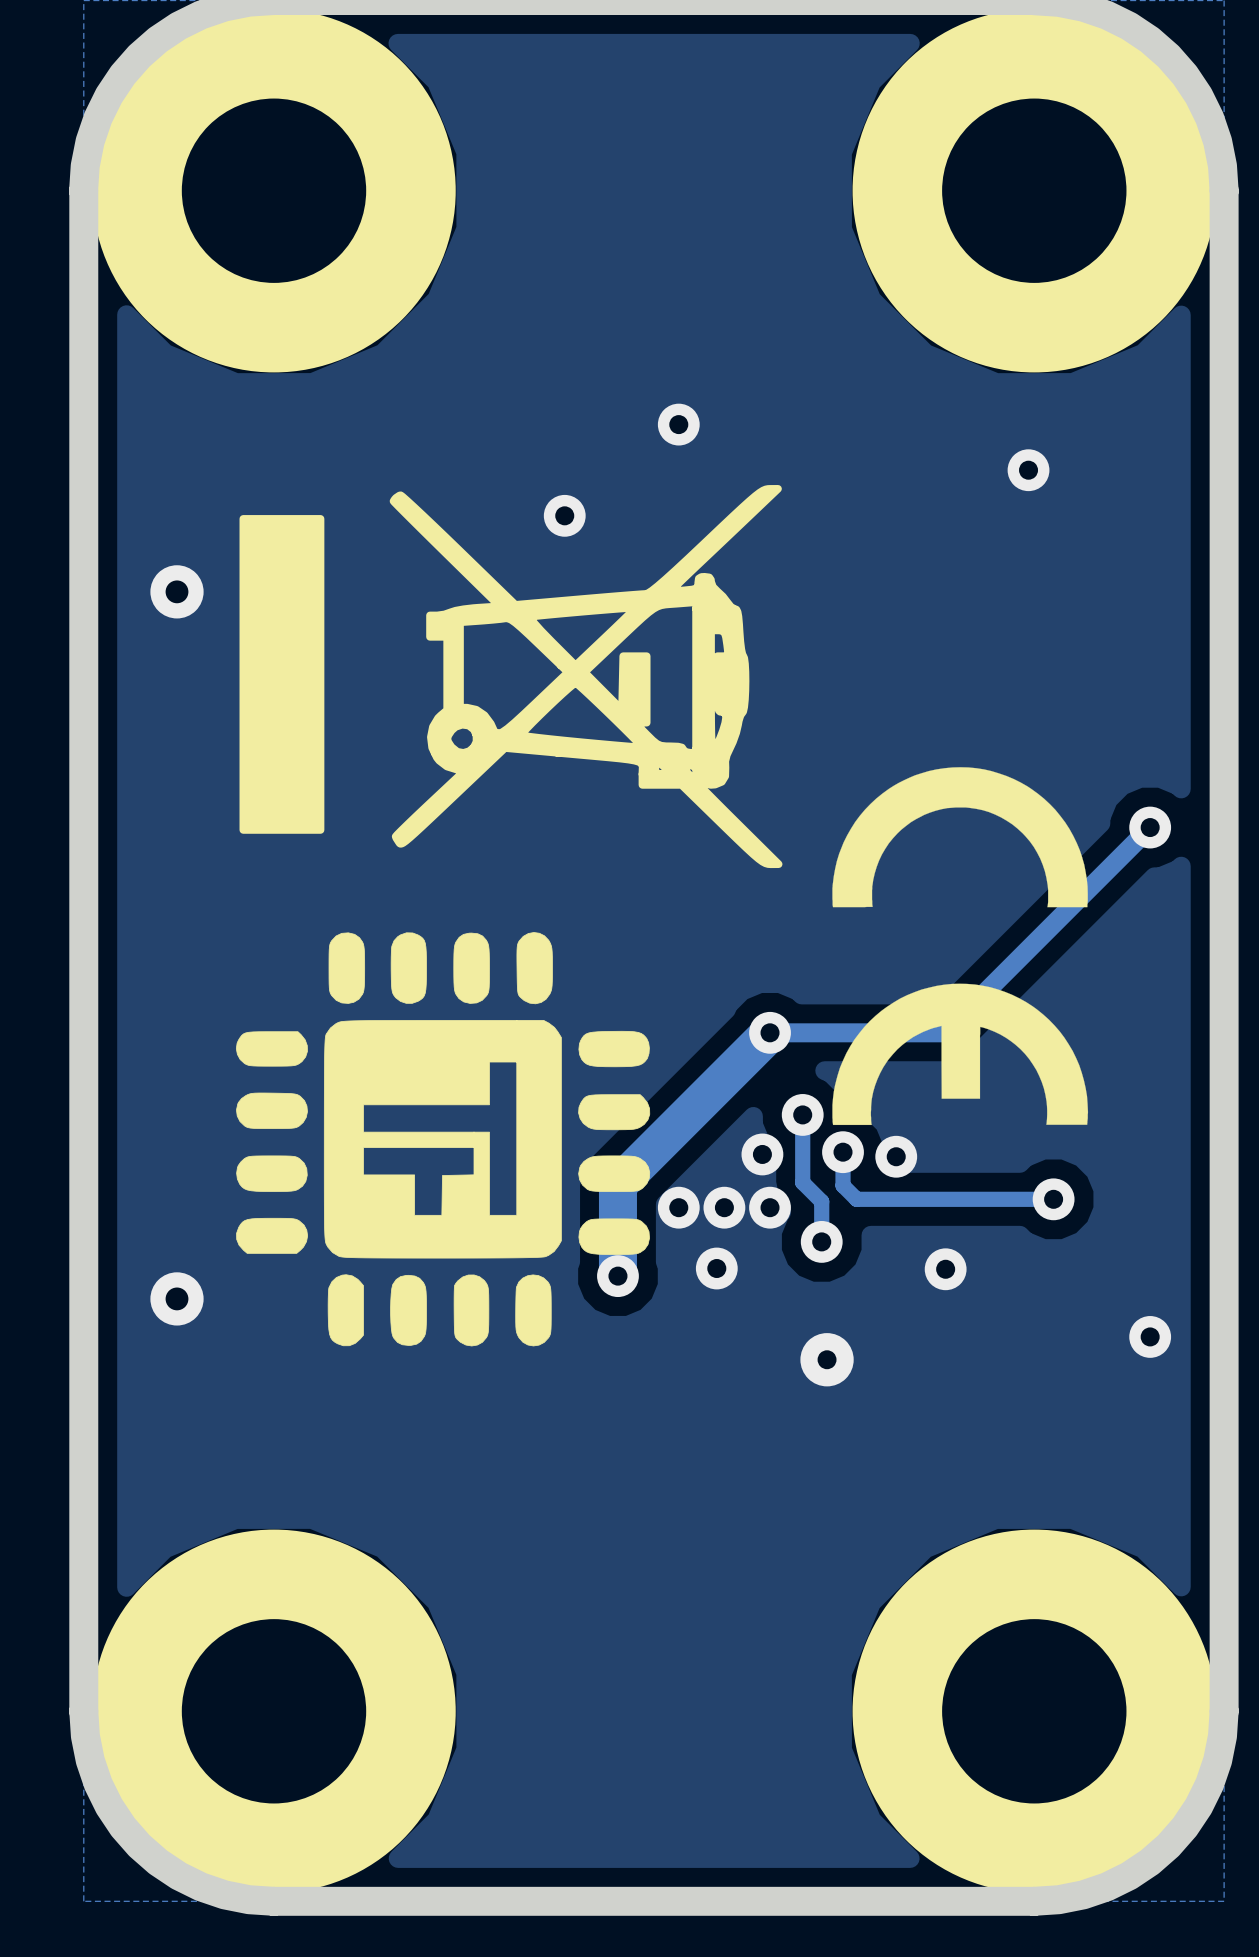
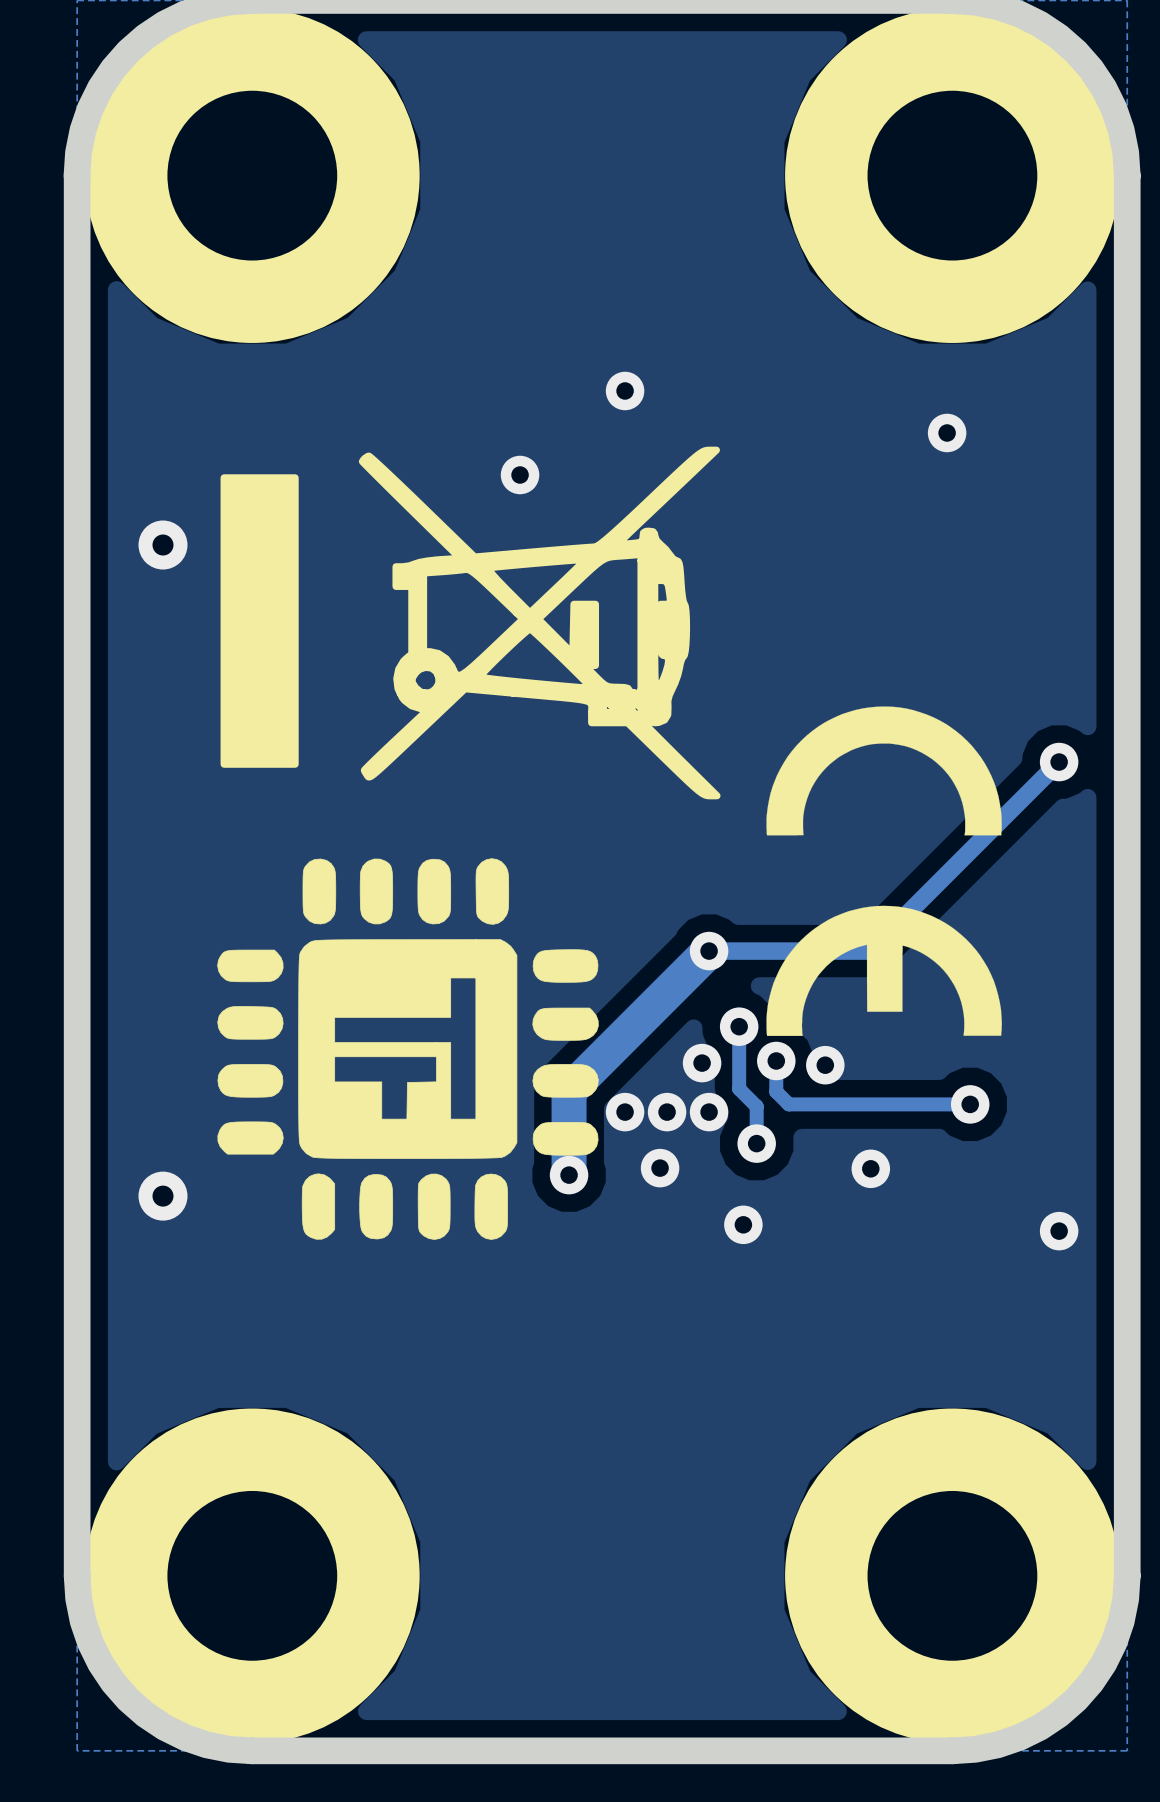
via position: (827, 1359) -> (743, 1224)

